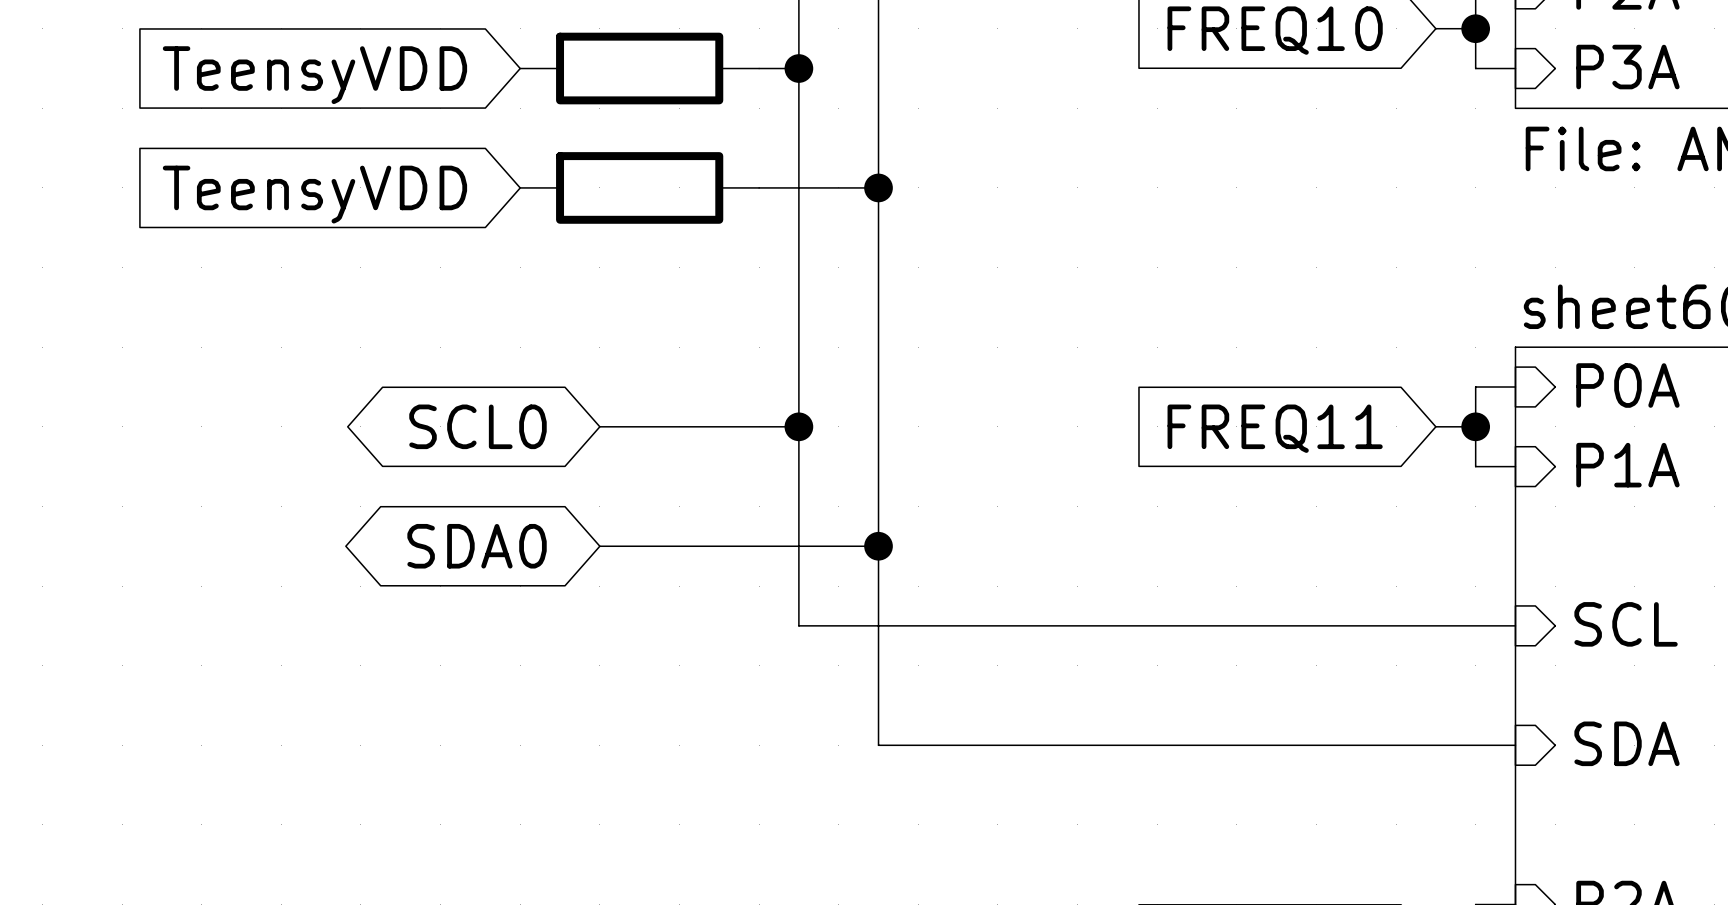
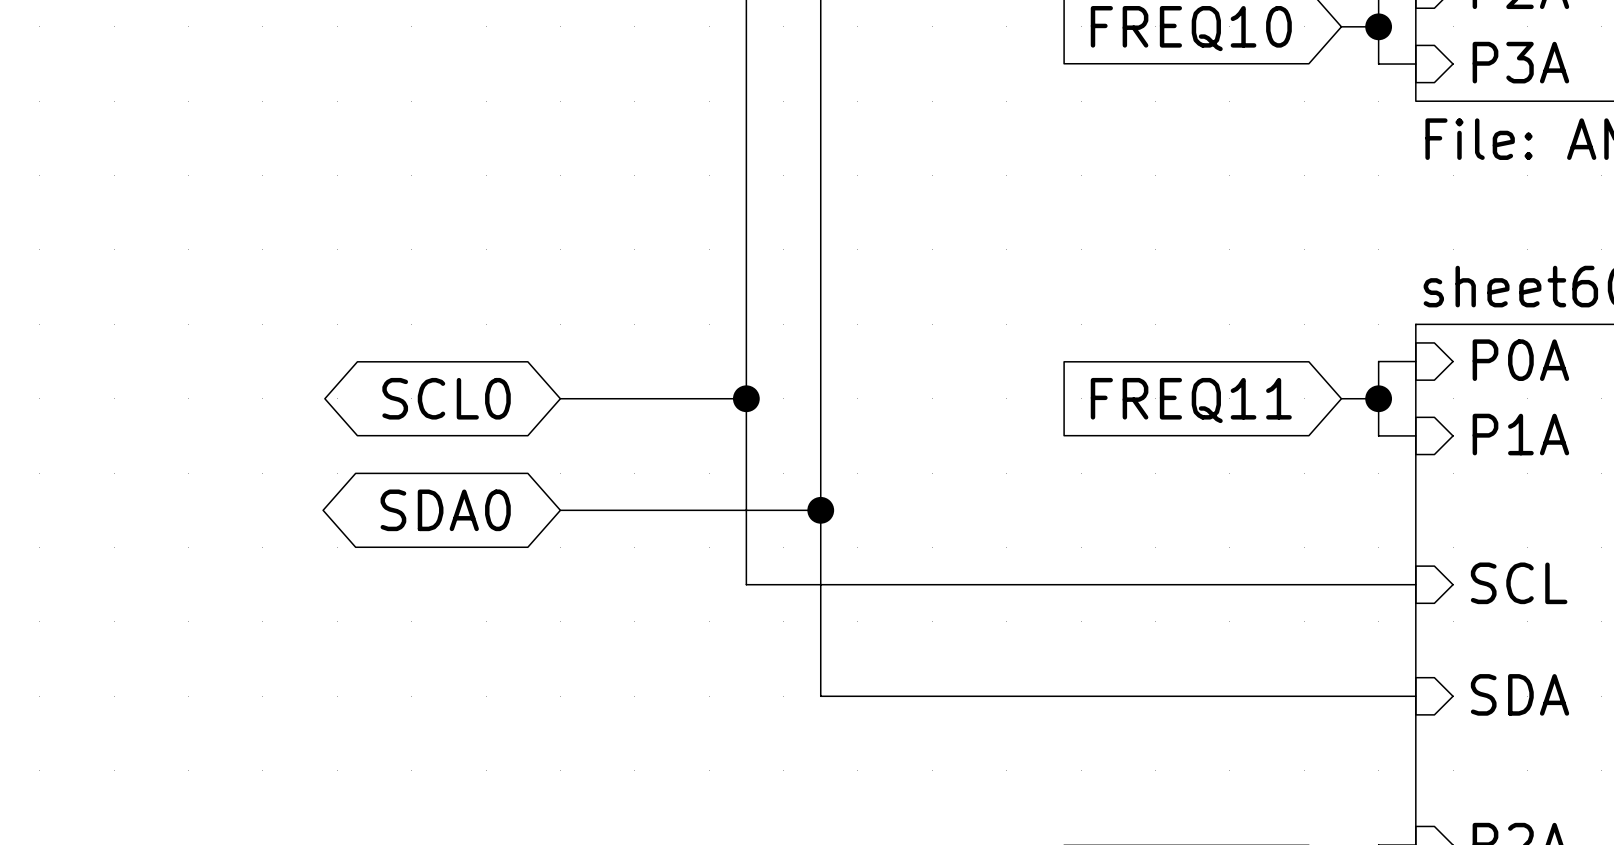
part: (639, 68) -> none
wire: (759, 68) (798, 68) -> none
junction: (798, 68) -> none
global label: TeensyVDD (314, 75) -> none
part: (639, 187) -> none
wire: (759, 187) (878, 187) -> none
junction: (878, 187) -> none
global label: TeensyVDD (314, 194) -> none

